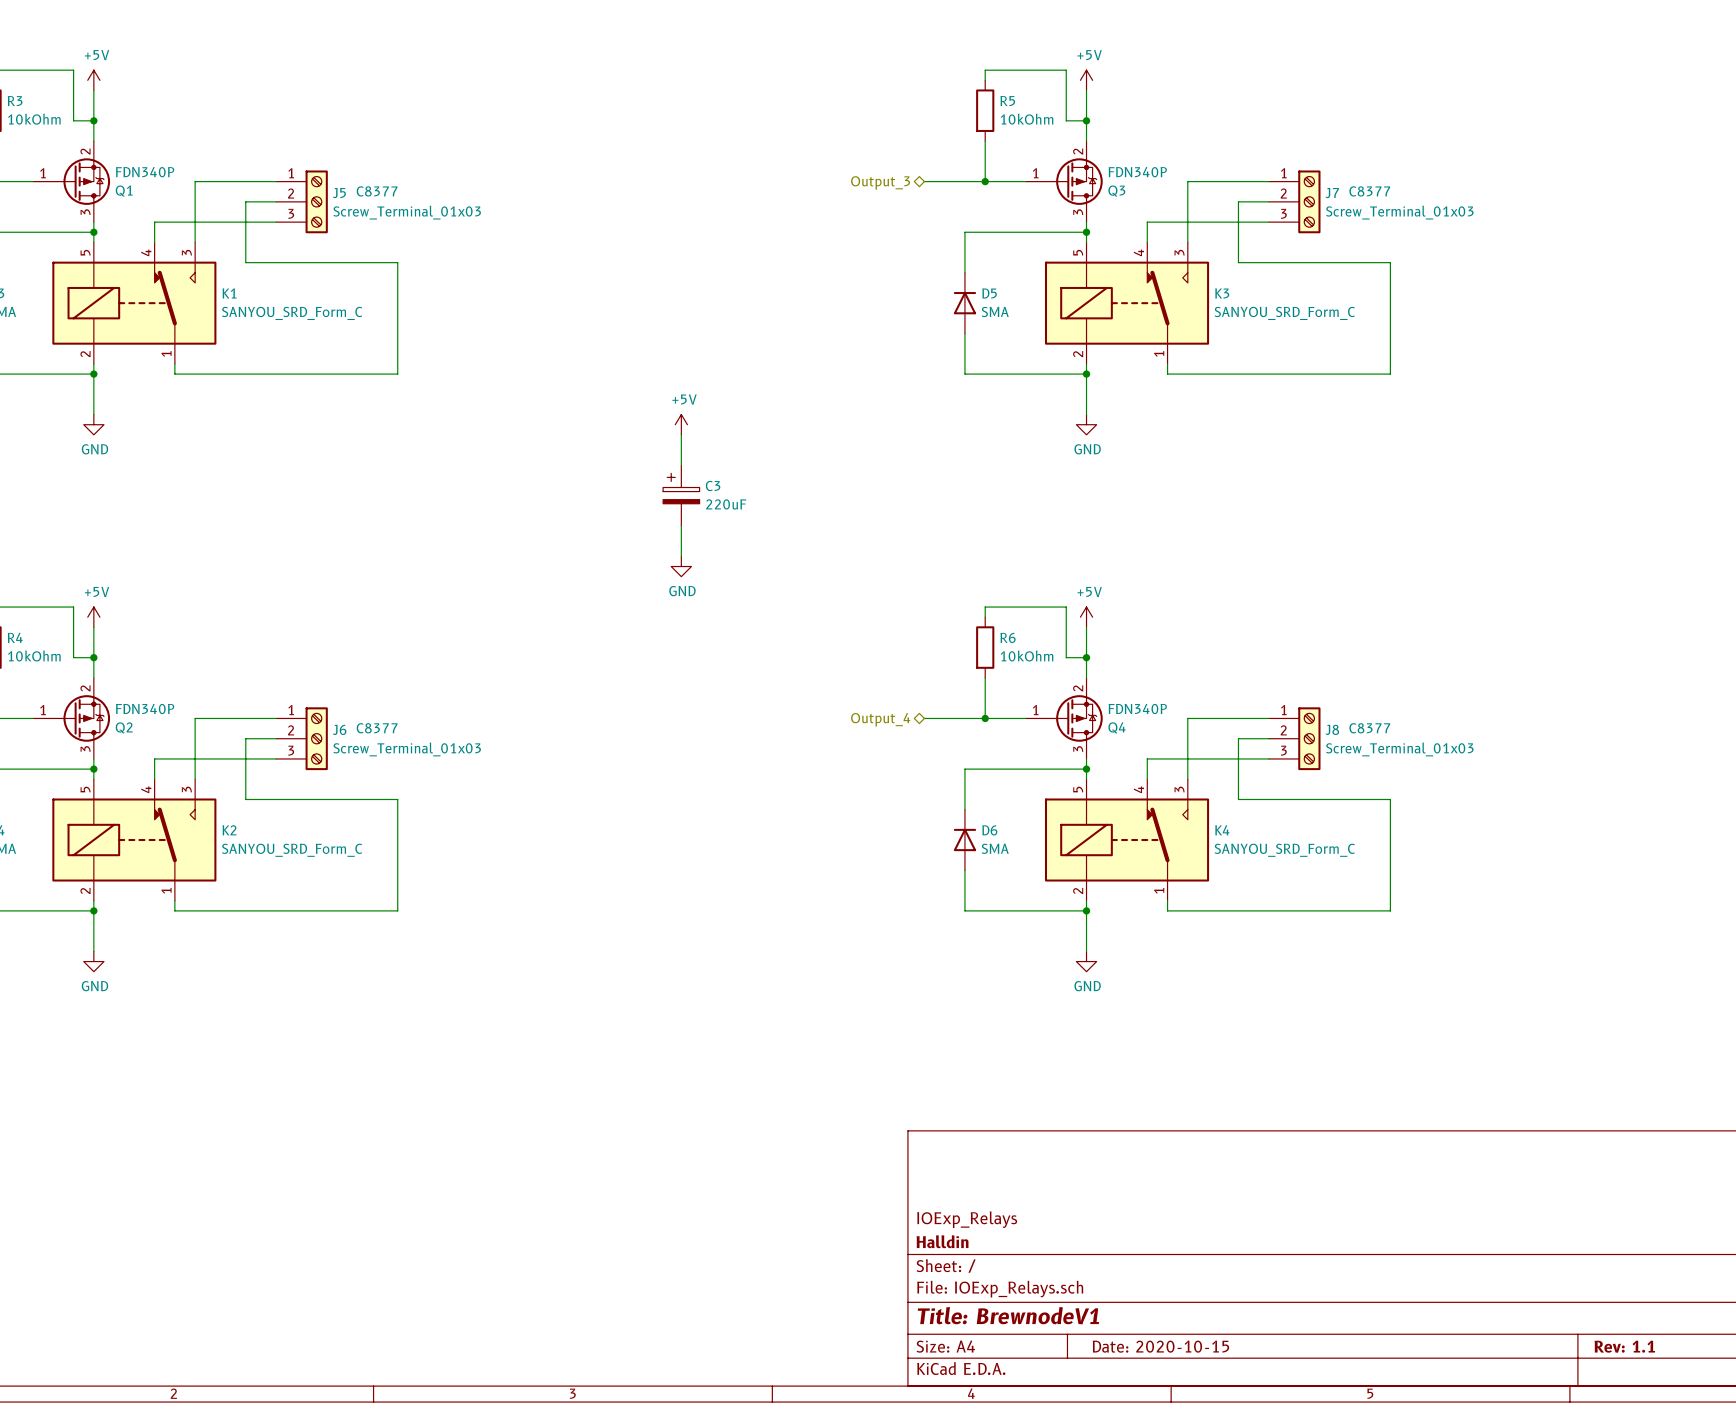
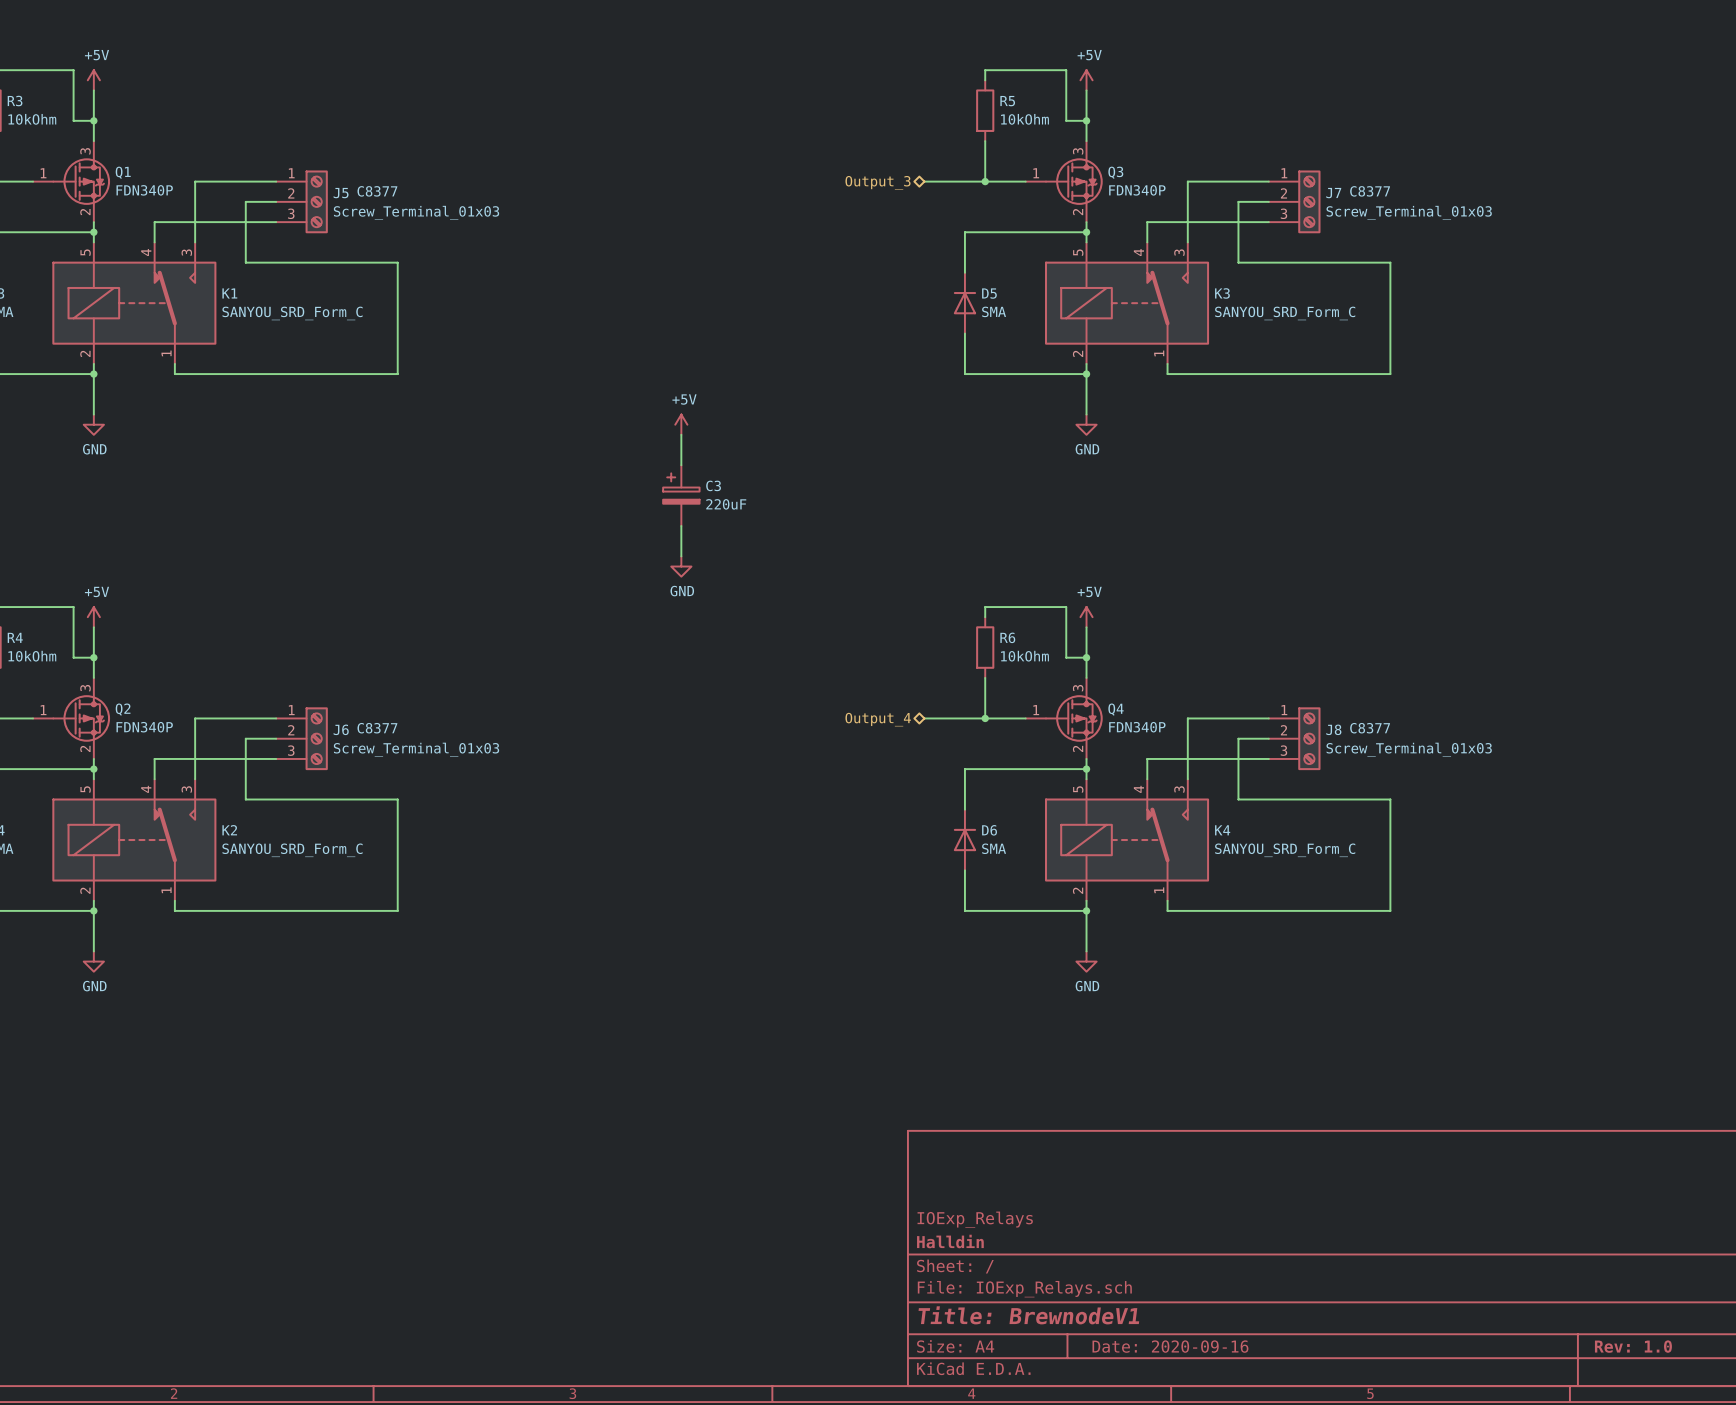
Q1 flip: as is (81, 181) -> up-down (81, 181)
Q3 flip: as is (1074, 181) -> up-down (1074, 181)
Q2 flip: as is (81, 718) -> up-down (81, 718)
Q4 flip: as is (1074, 718) -> up-down (1074, 718)
title block: Date: 2020-10-15 (1160, 1346) -> Date: 2020-09-16 (1170, 1346)
title block: Rev: 1.1 (1624, 1346) -> Rev: 1.0 (1633, 1346)

